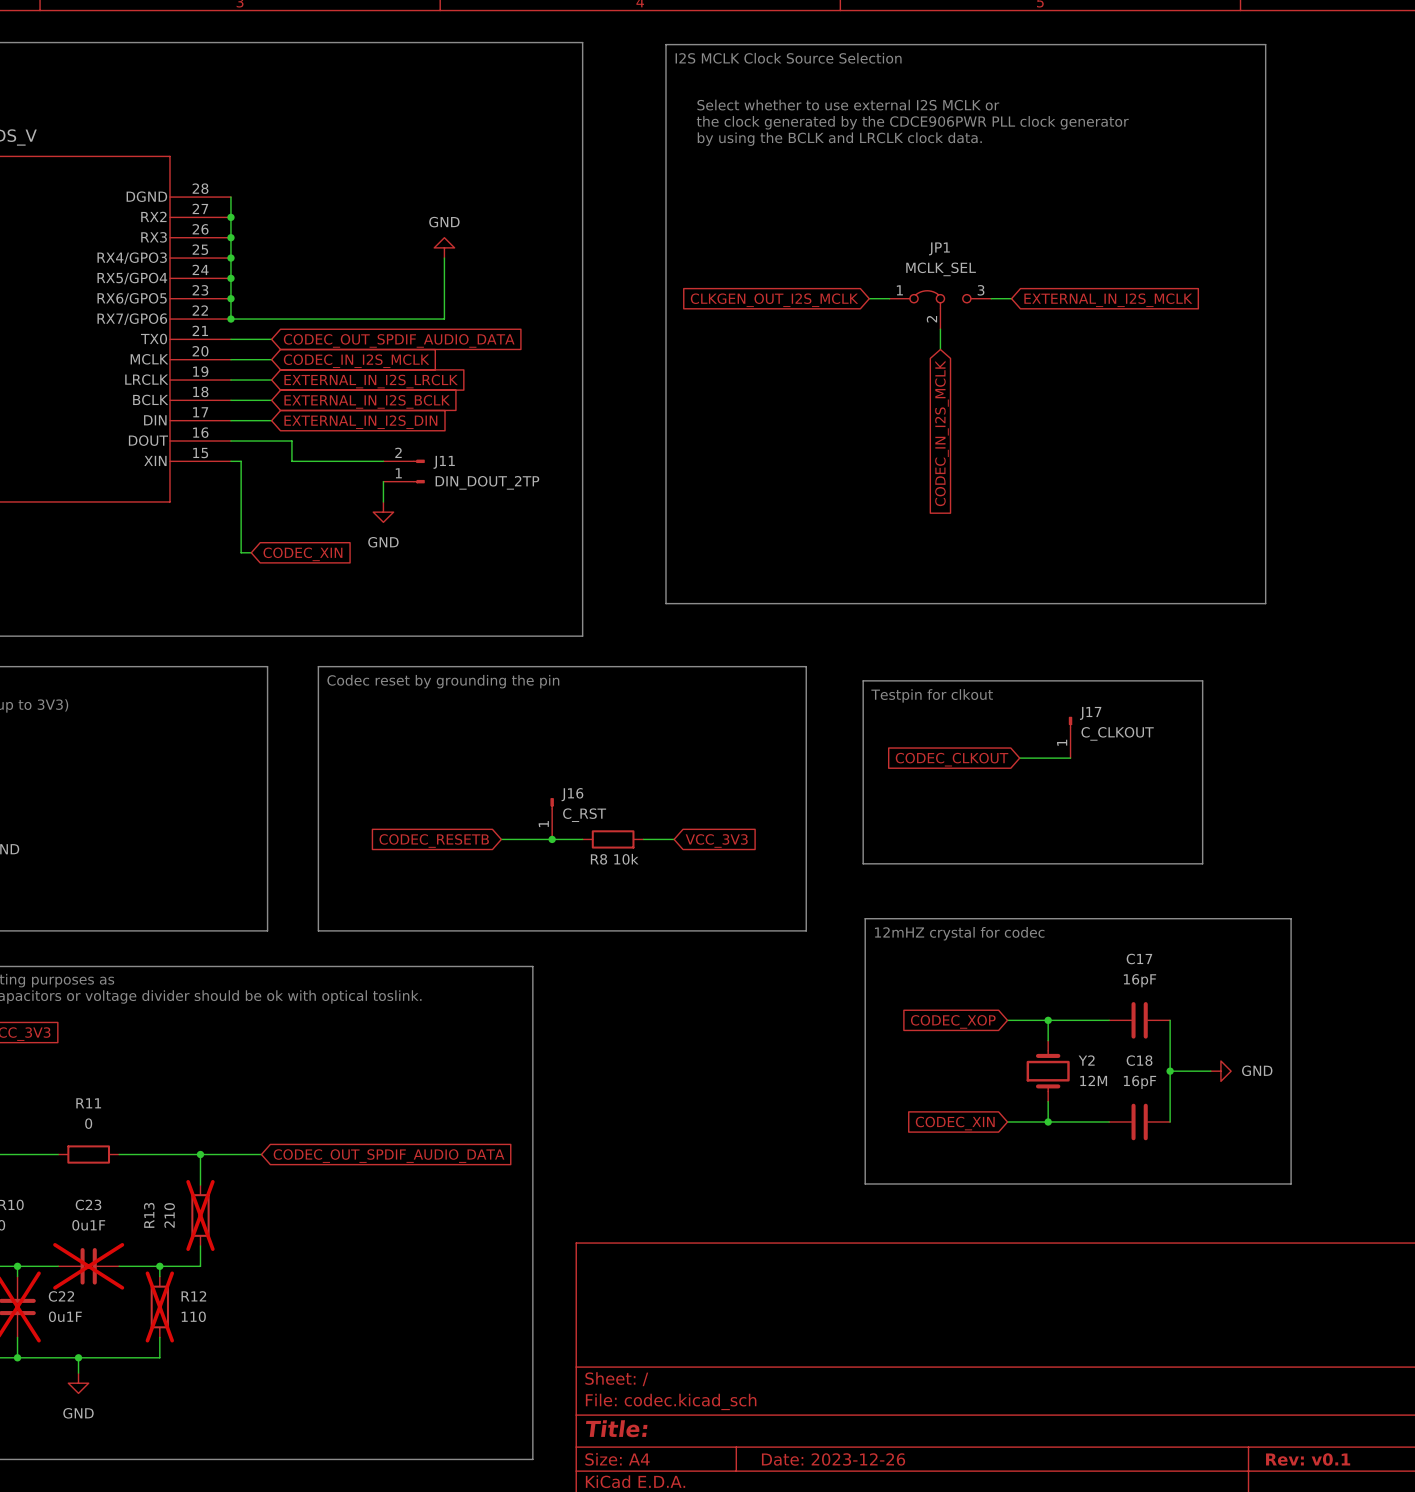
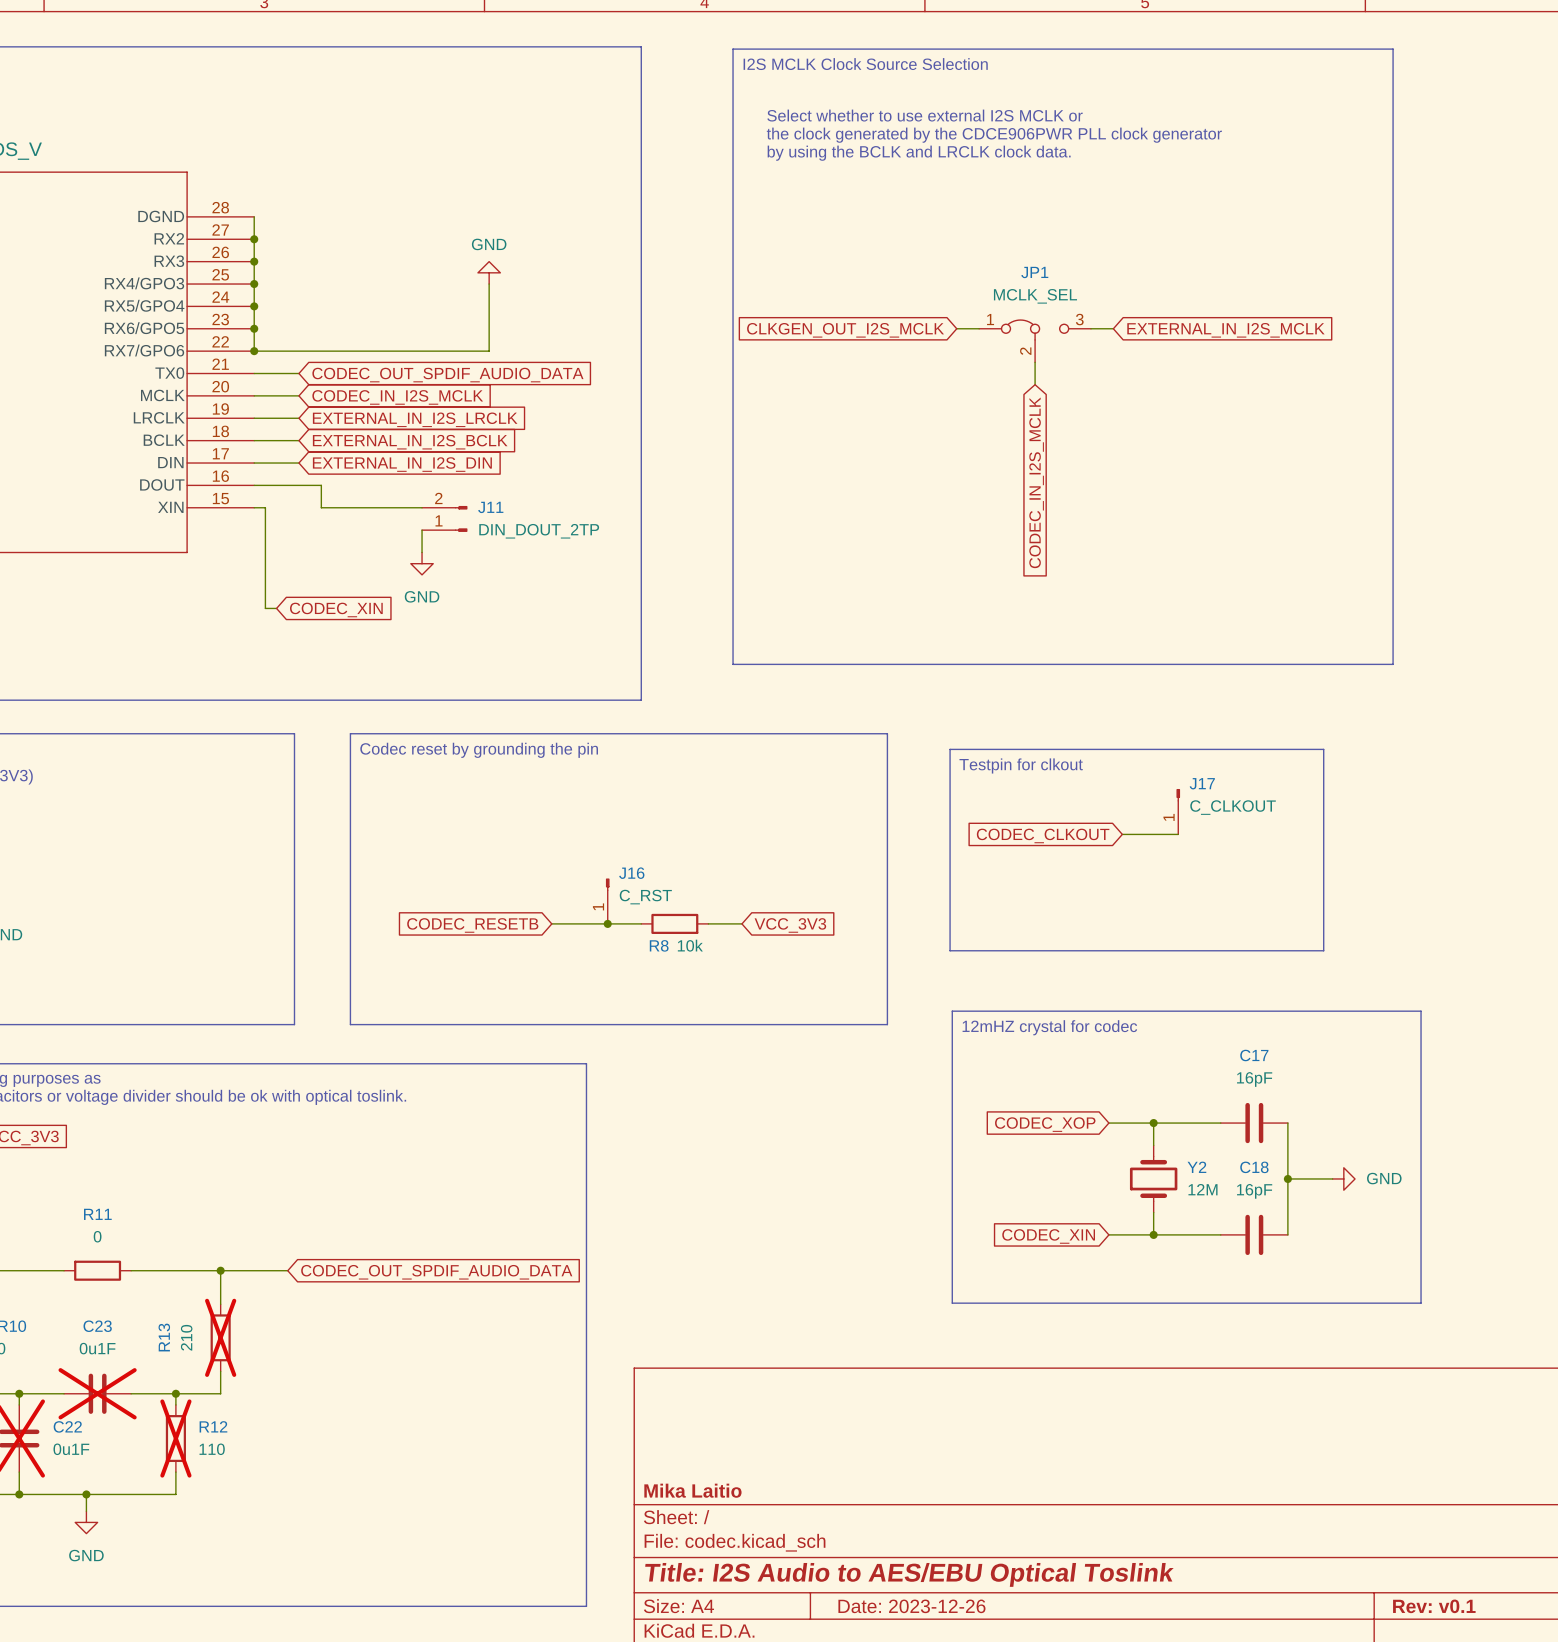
title block: none -> Mika Laitio (692, 1490)
title block: Title: (616, 1428) -> Title: I2S Audio to AES/EBU Optical Toslink (909, 1574)

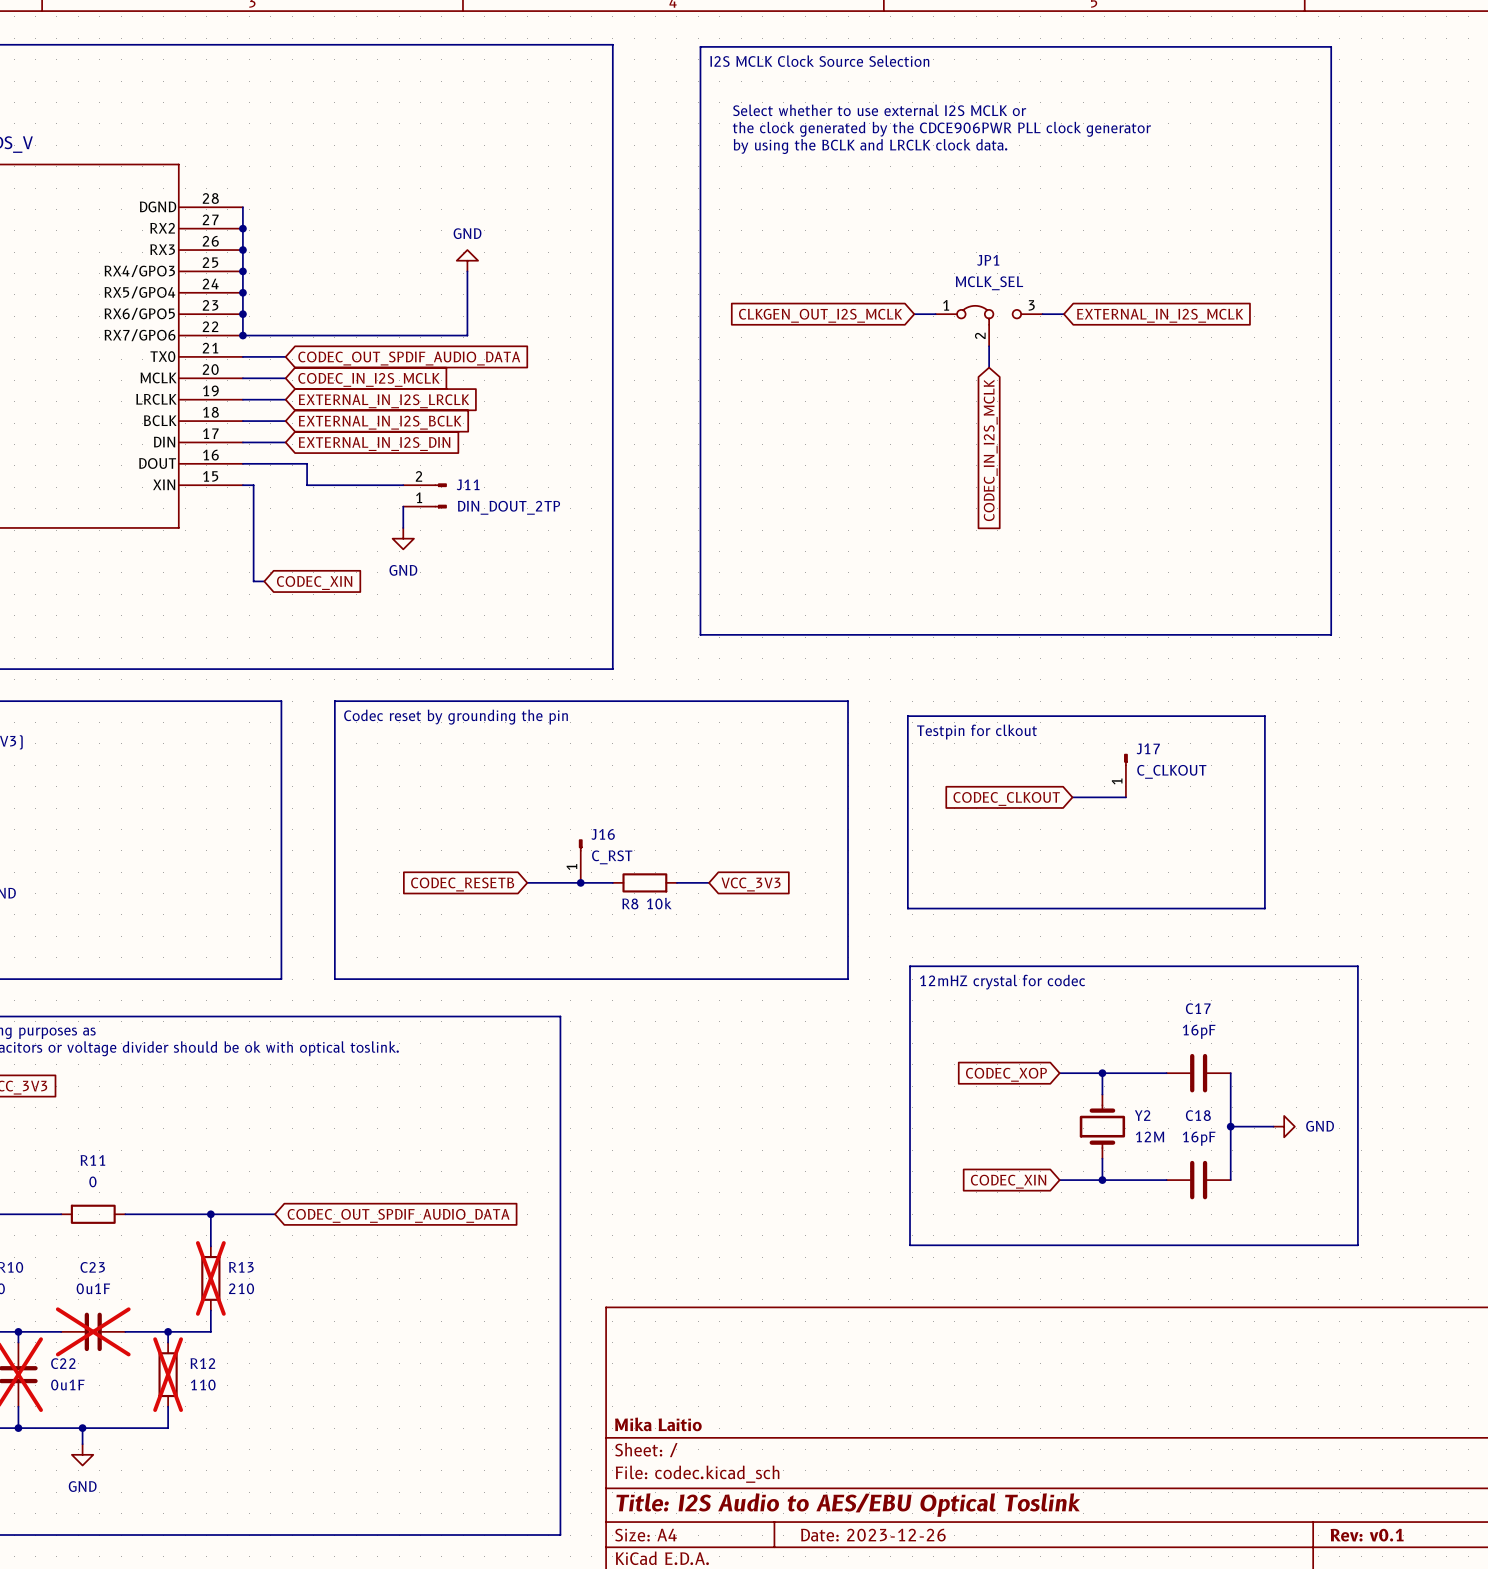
R13 name rotation: 0° (164, 1337) -> 90° clockwise (241, 1267)
R13 name position: R13 (164, 1337) -> R13 (241, 1267)
R13 value rotation: 0° (186, 1337) -> 90° clockwise (241, 1288)
R13 value position: 210 (186, 1337) -> 210 (241, 1288)

